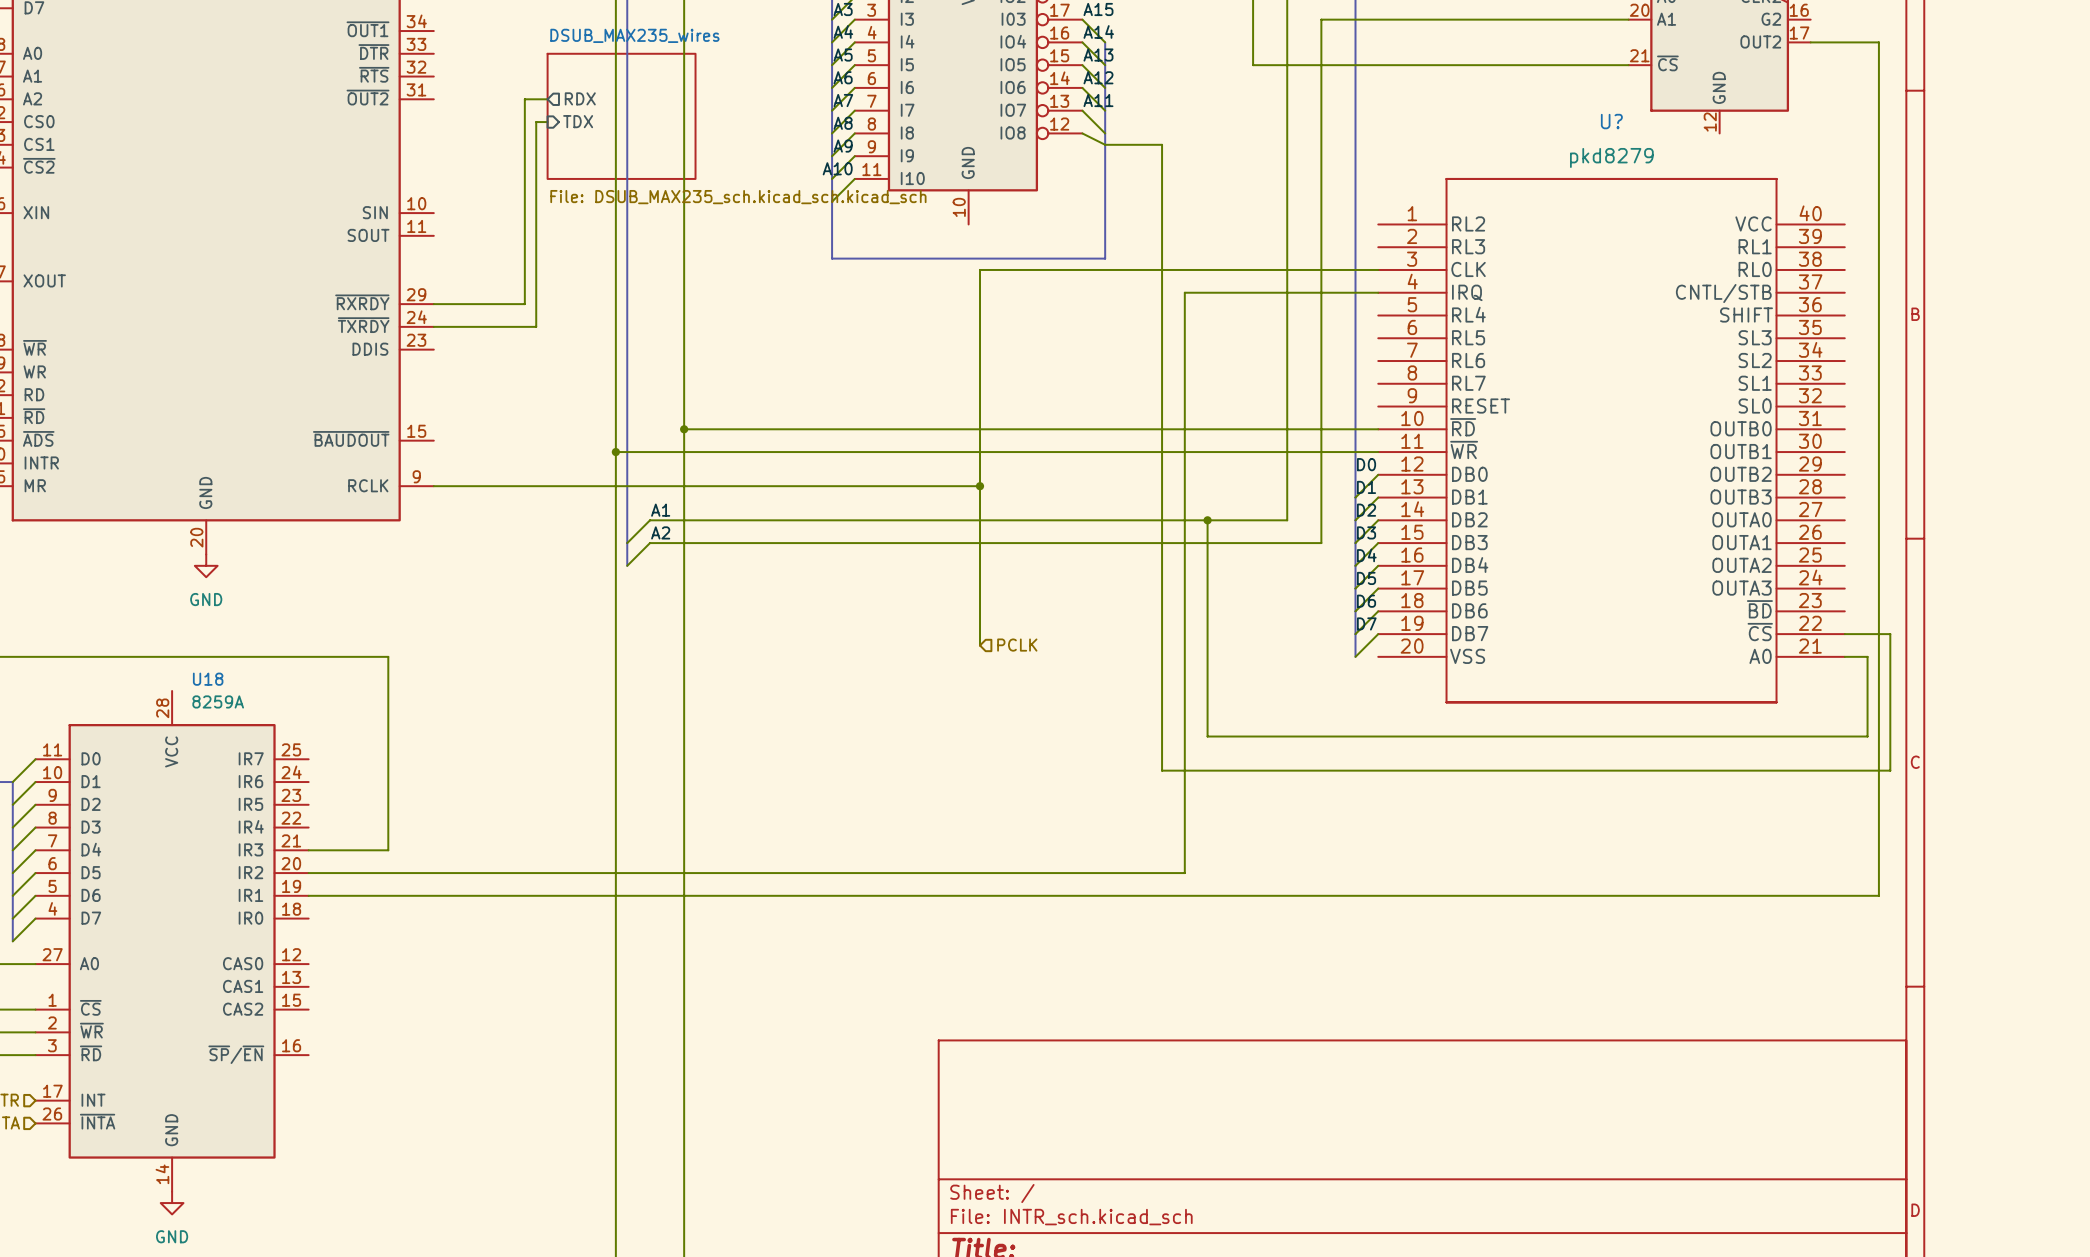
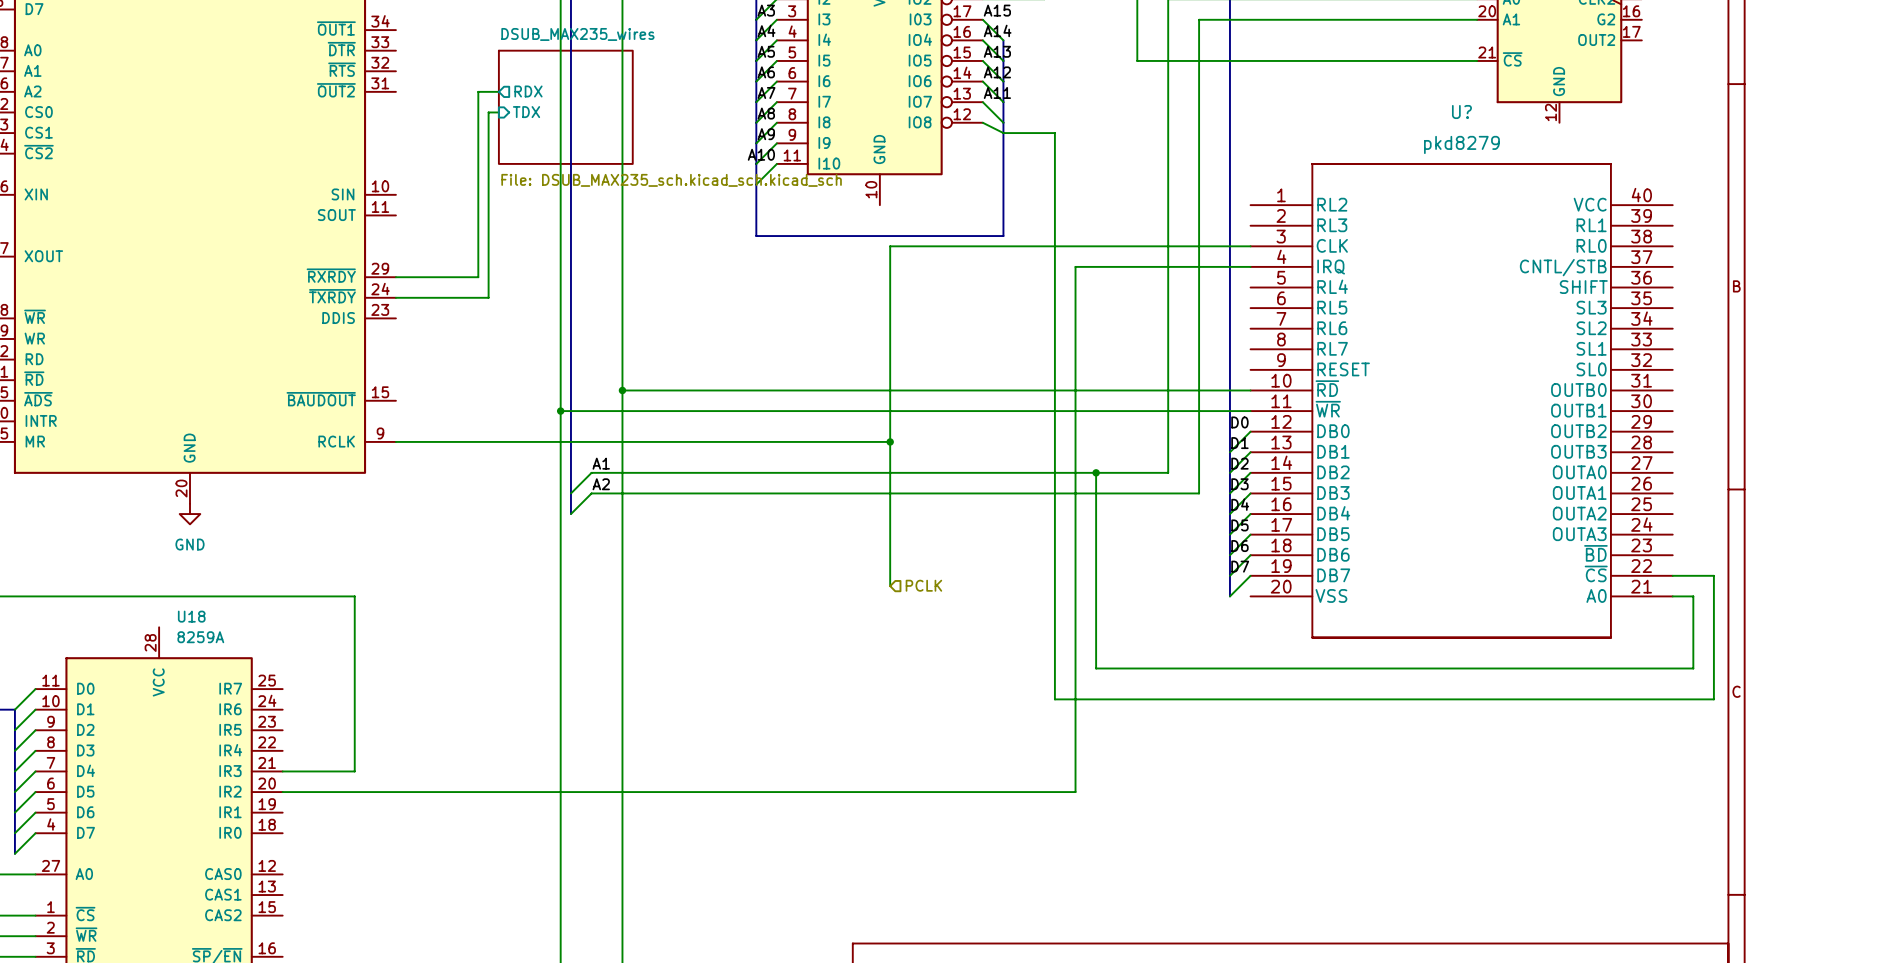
wire: (1810, 42) (1878, 42) (1878, 895) (308, 895) -> none

